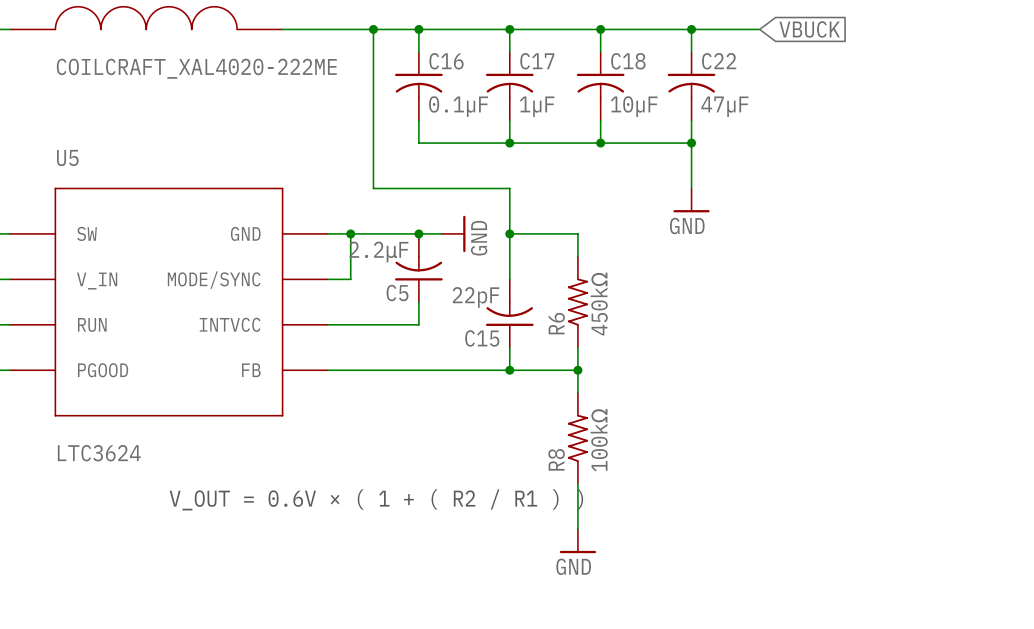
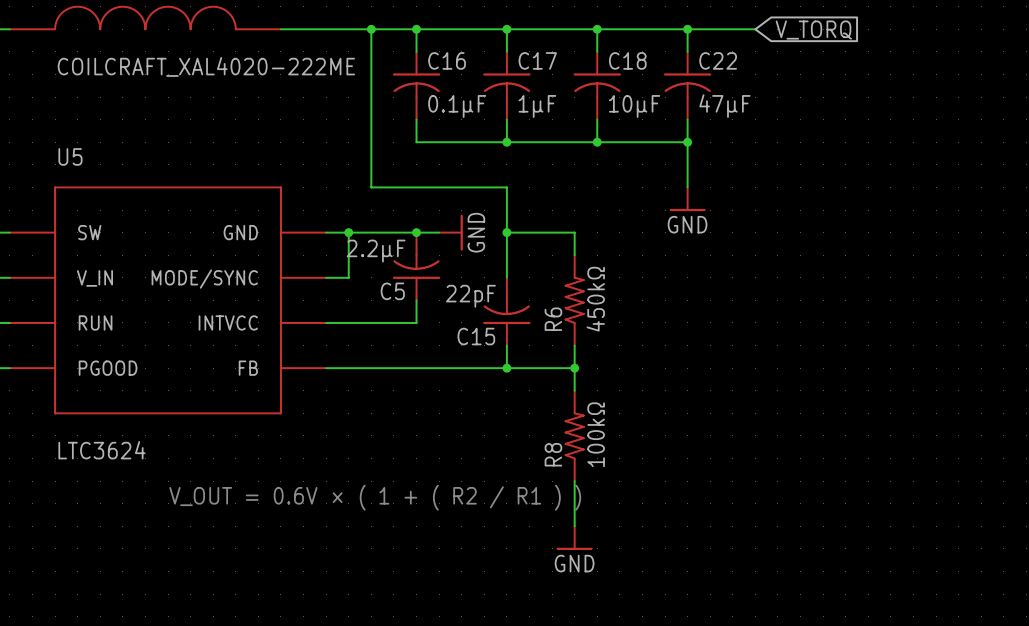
global label: VBUCK (809, 29) -> V_TORQ (813, 30)

